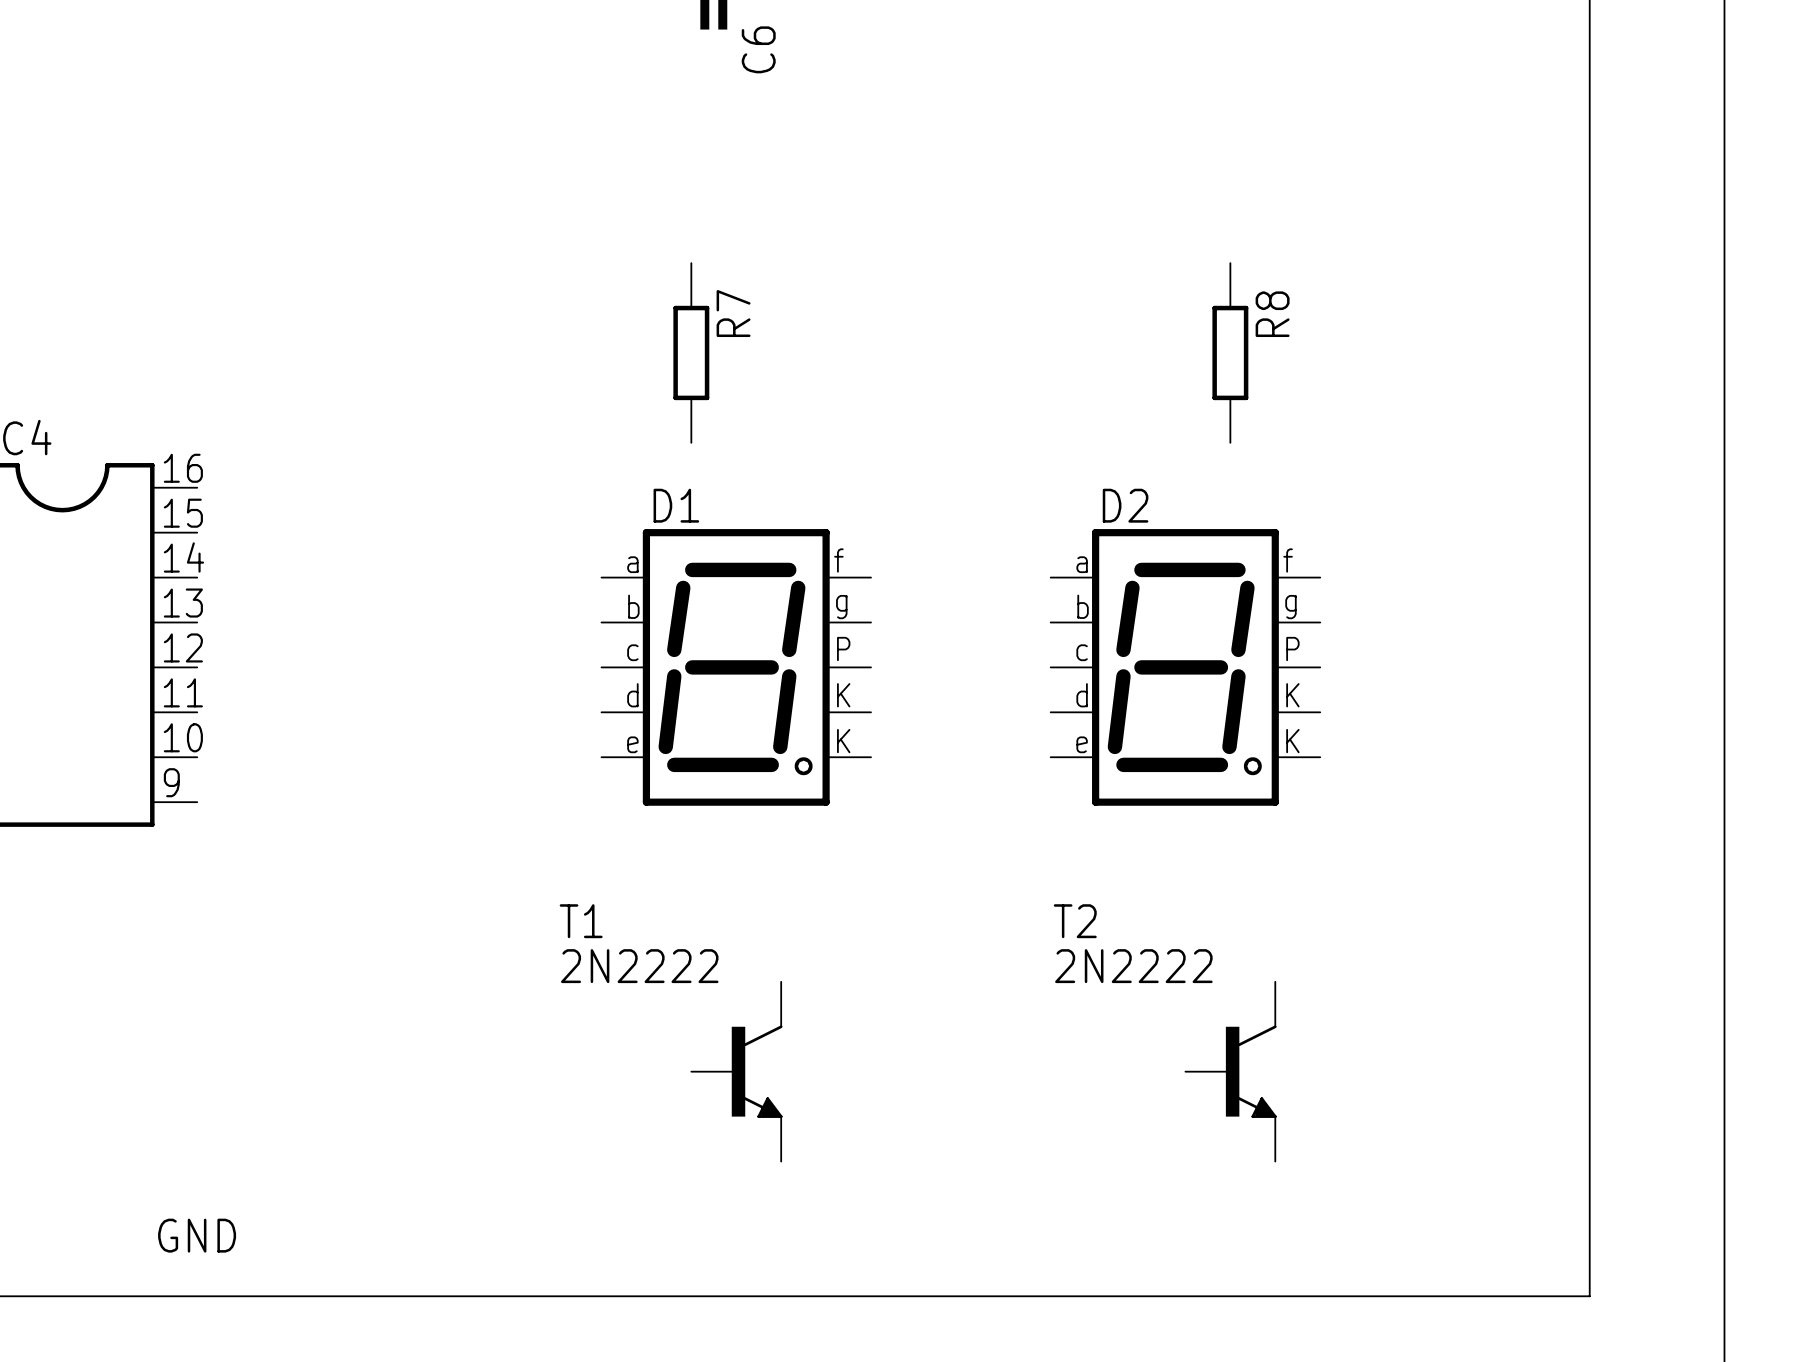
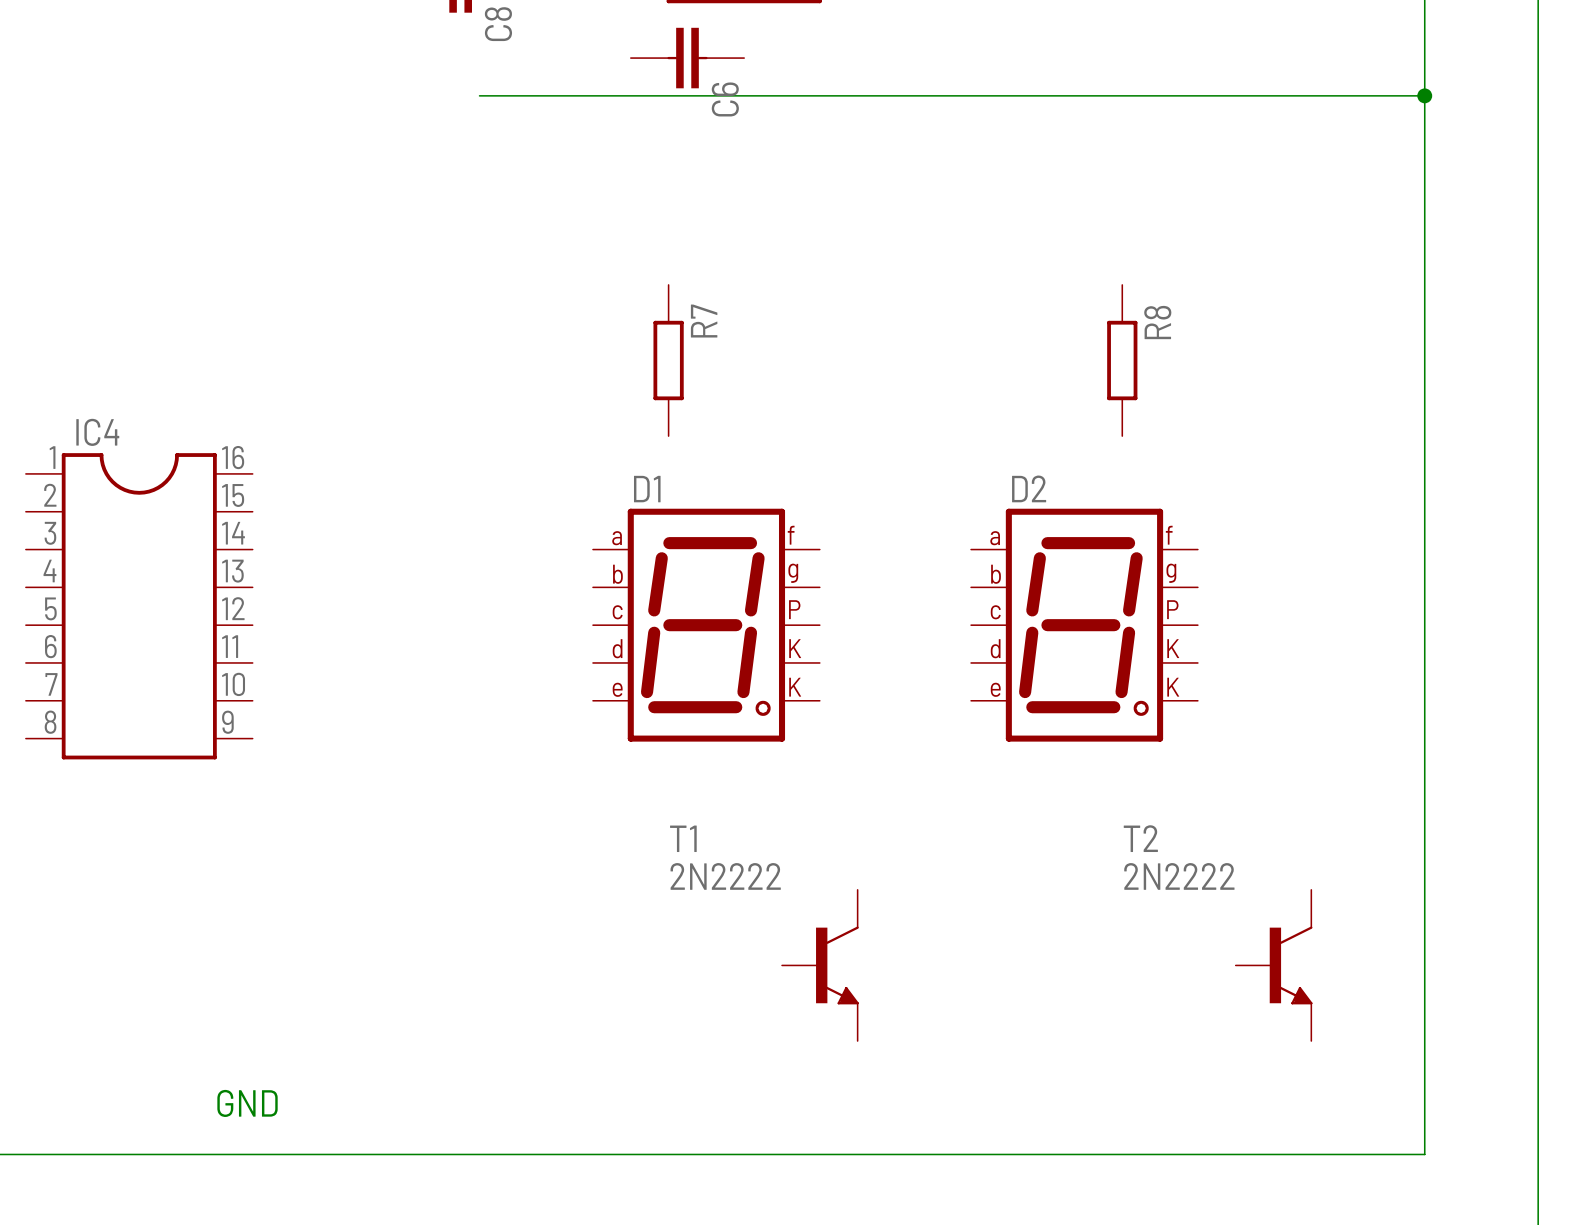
wire: none -> (479, 95) (1424, 95)
junction: none -> (1424, 95)
T1 position: (736, 1071) -> (820, 965)
T2 position: (1231, 1071) -> (1274, 965)

